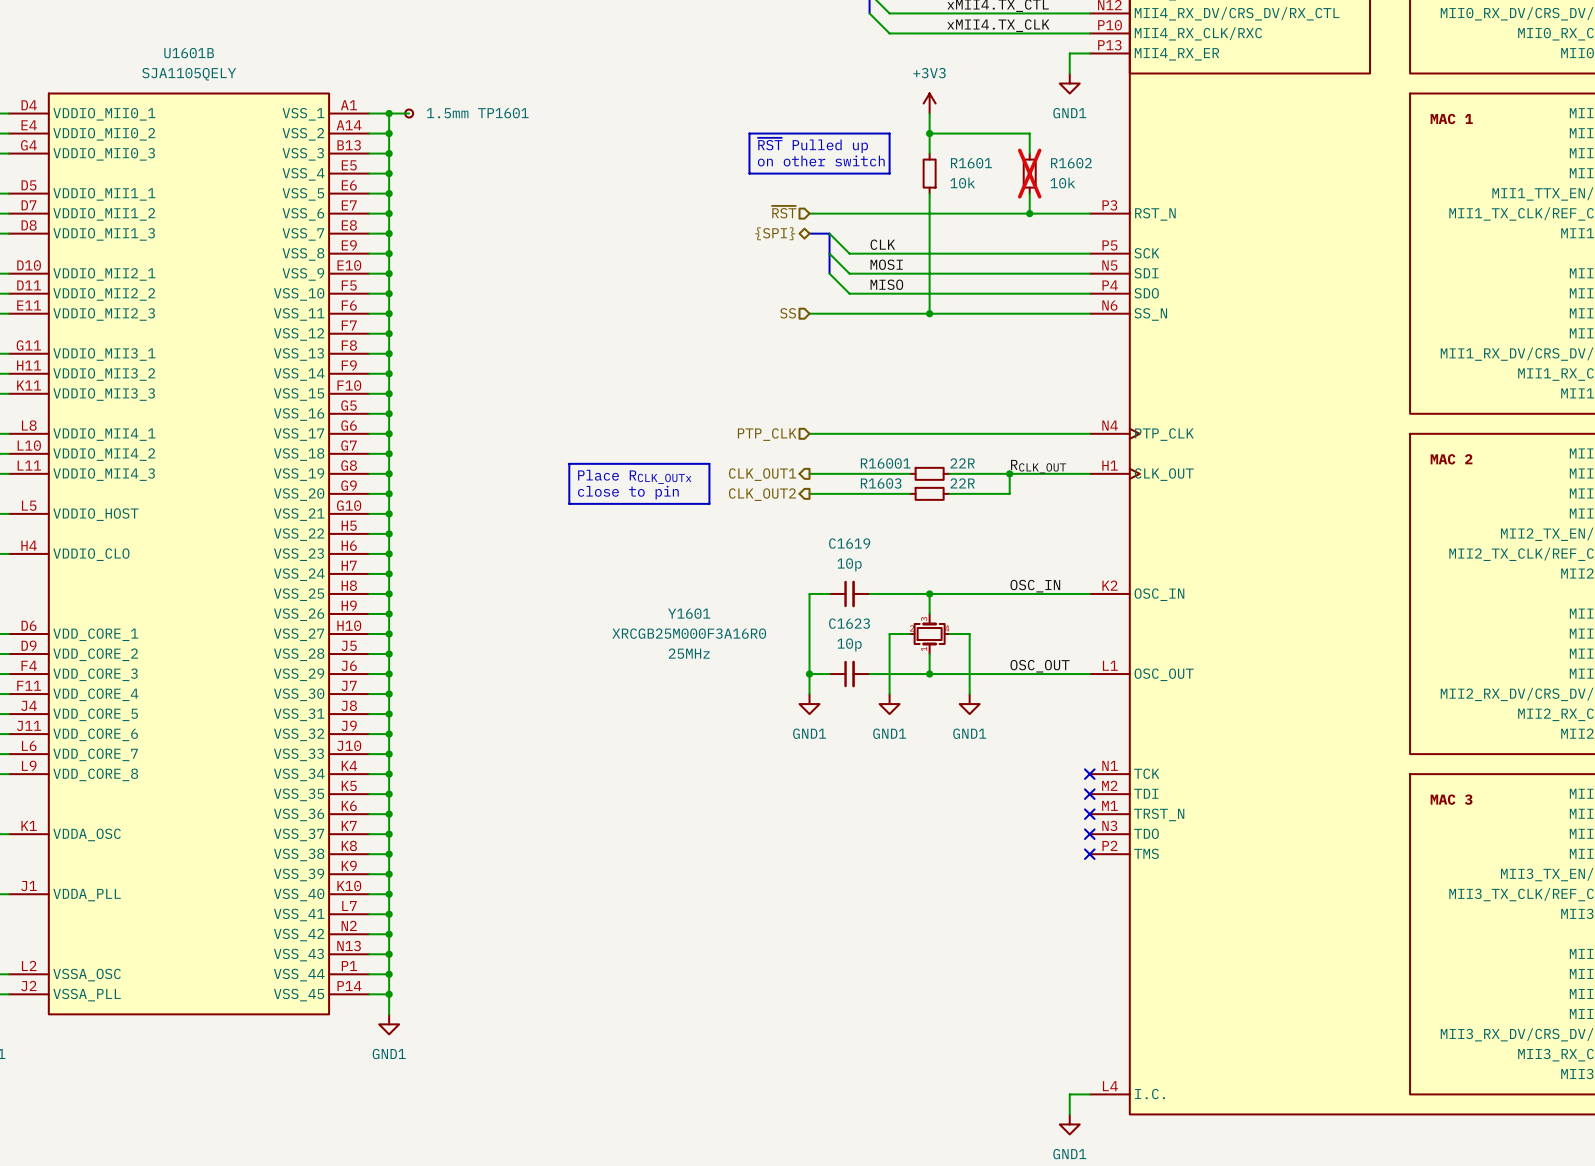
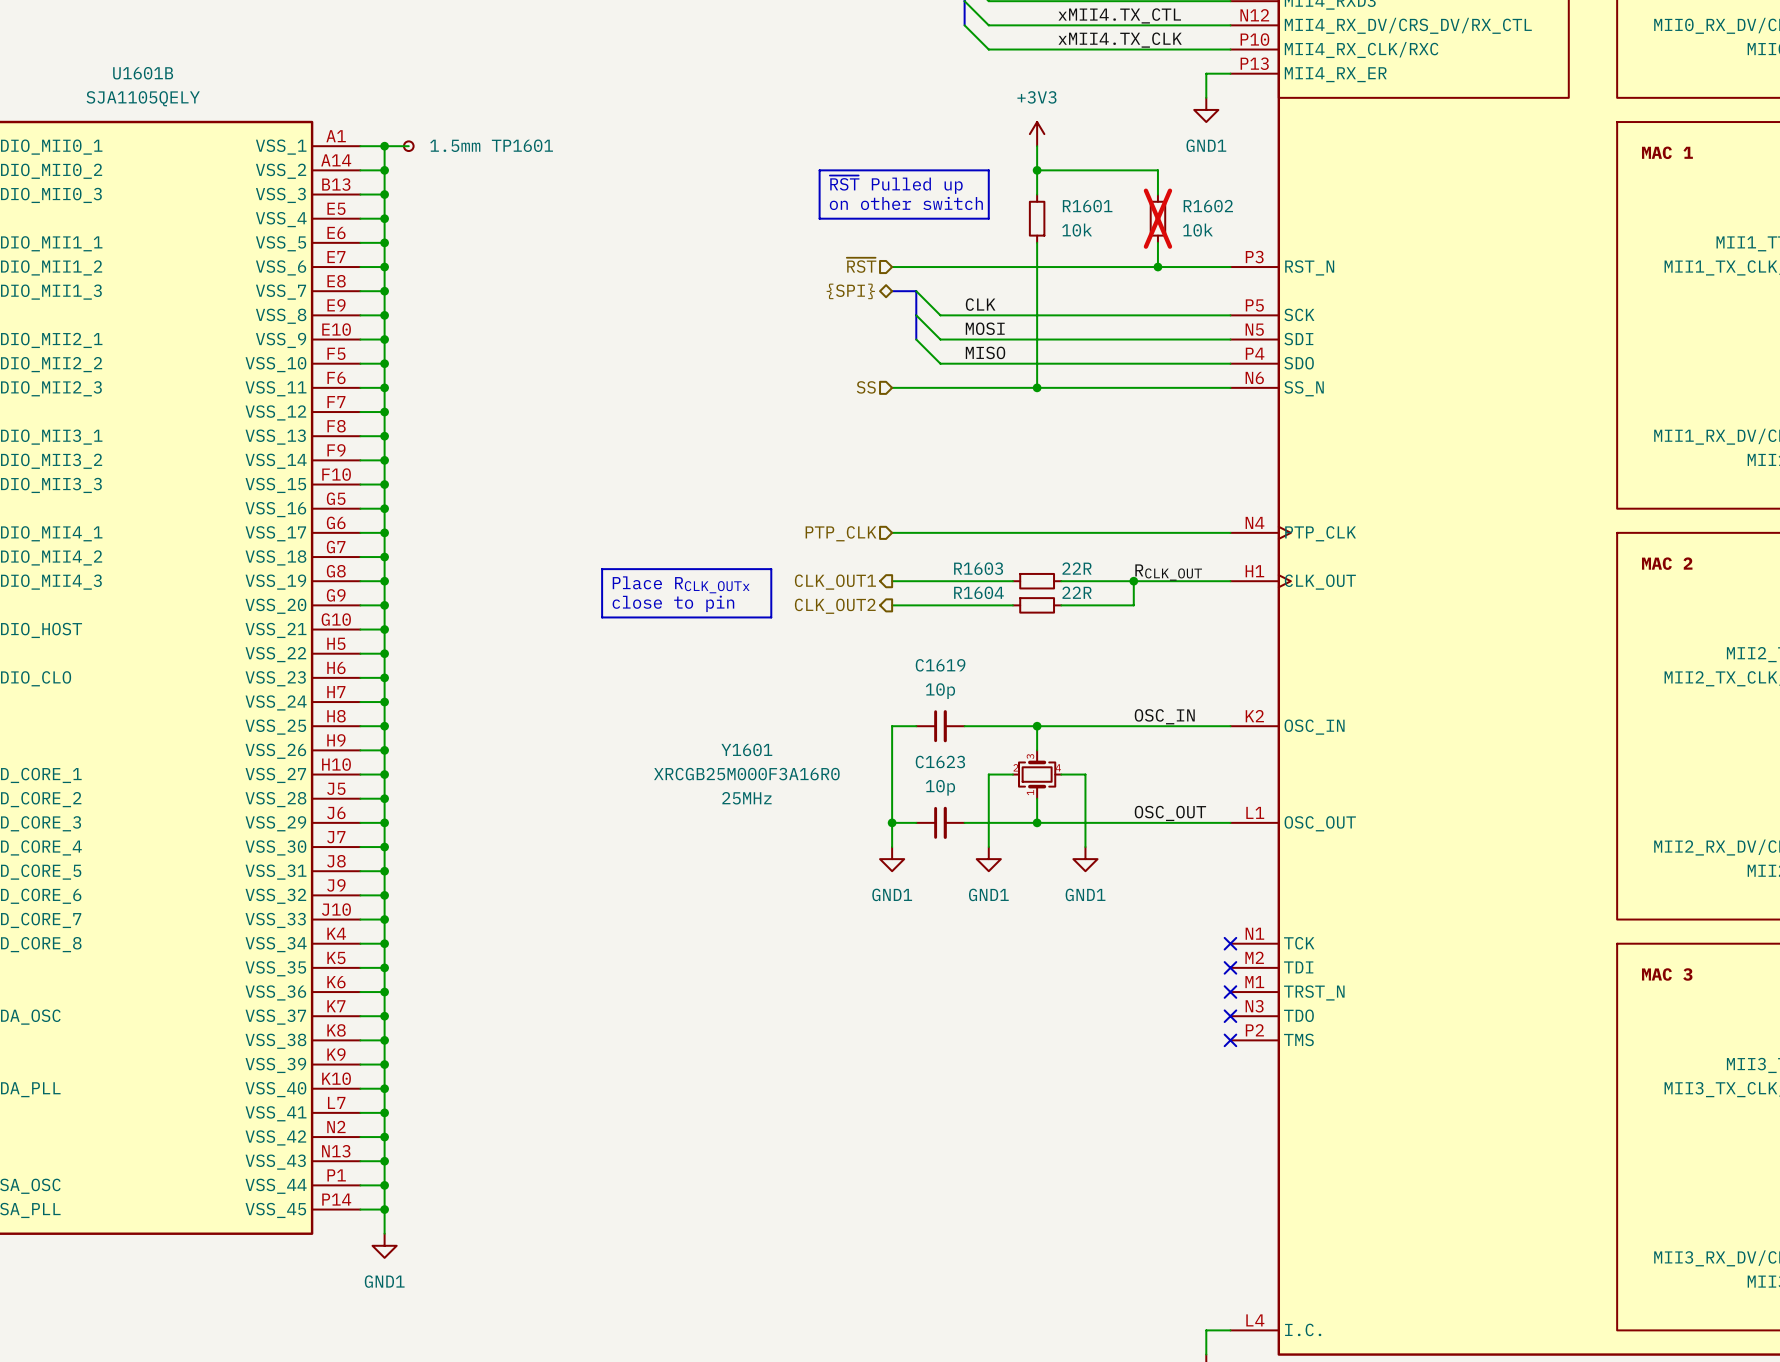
R16001 name: R16001 (885, 463) -> R1603 (978, 568)
R1603 name: R1603 (881, 483) -> R1604 (978, 592)

